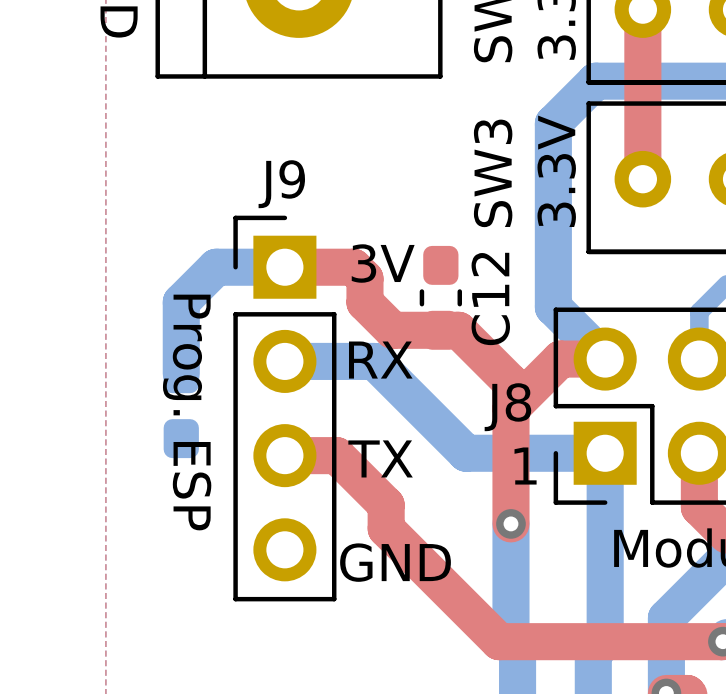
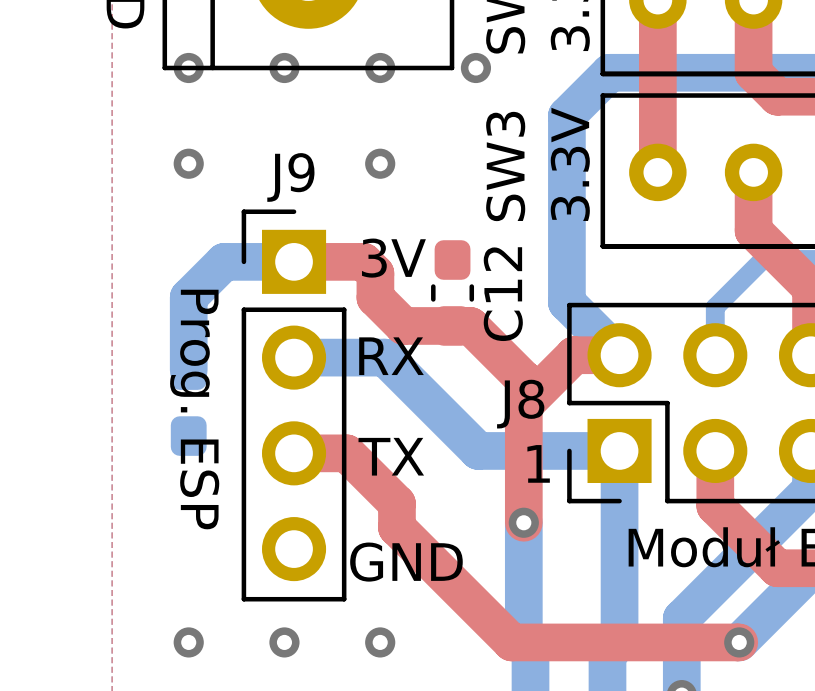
via: none -> (188, 67)
via: none -> (284, 67)
via: none -> (380, 67)
via: none -> (475, 67)
via: none -> (188, 163)
via: none -> (380, 163)
via: none -> (188, 642)
via: none -> (284, 642)
via: none -> (380, 642)

